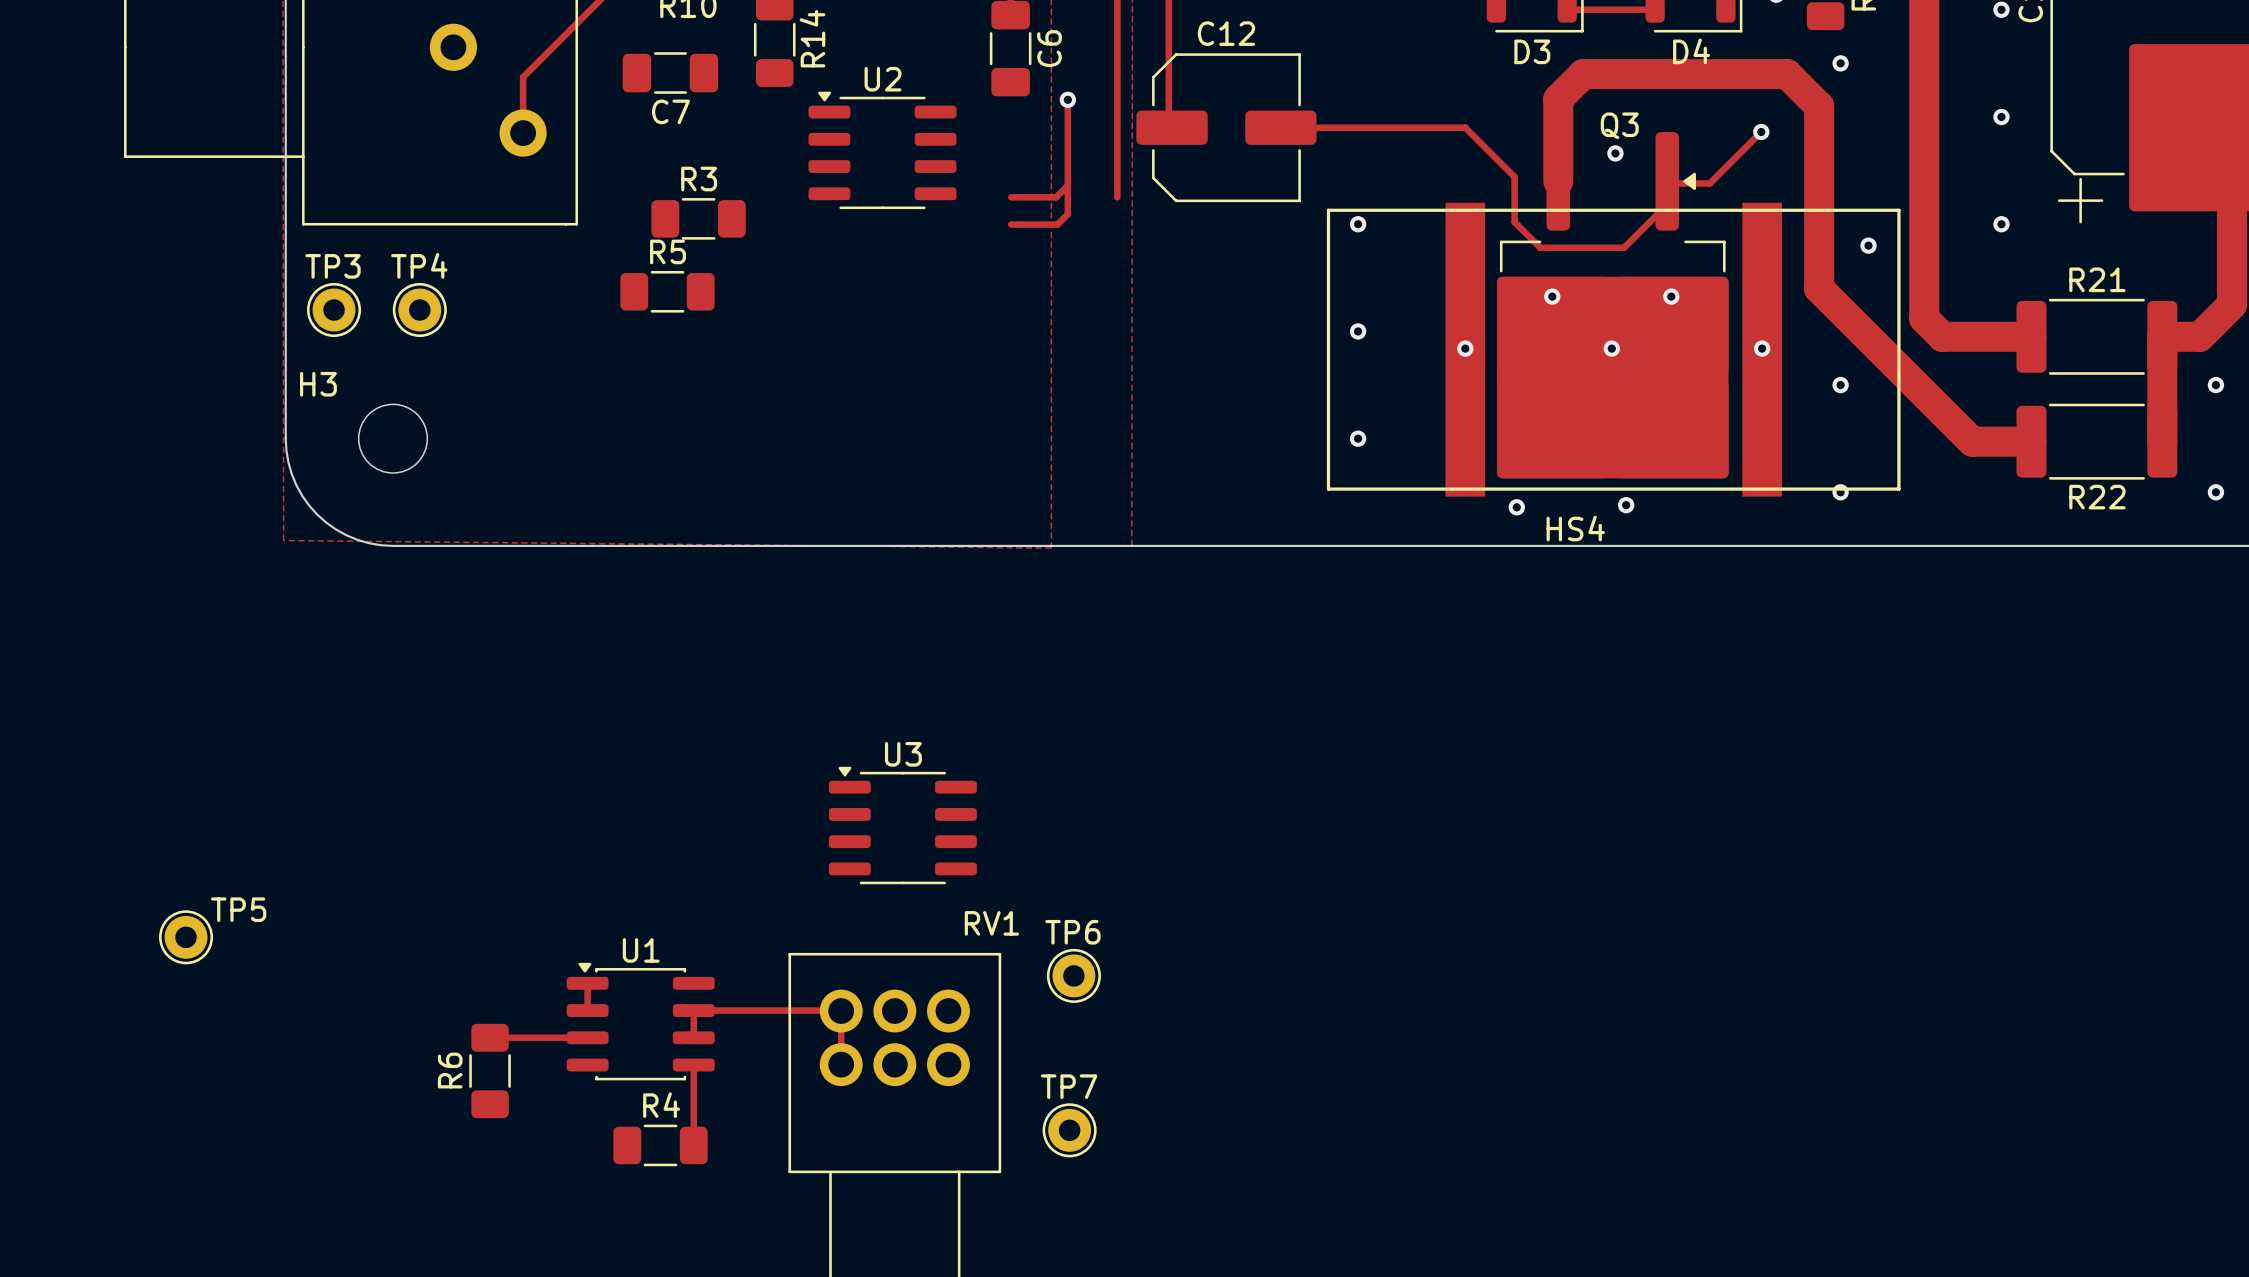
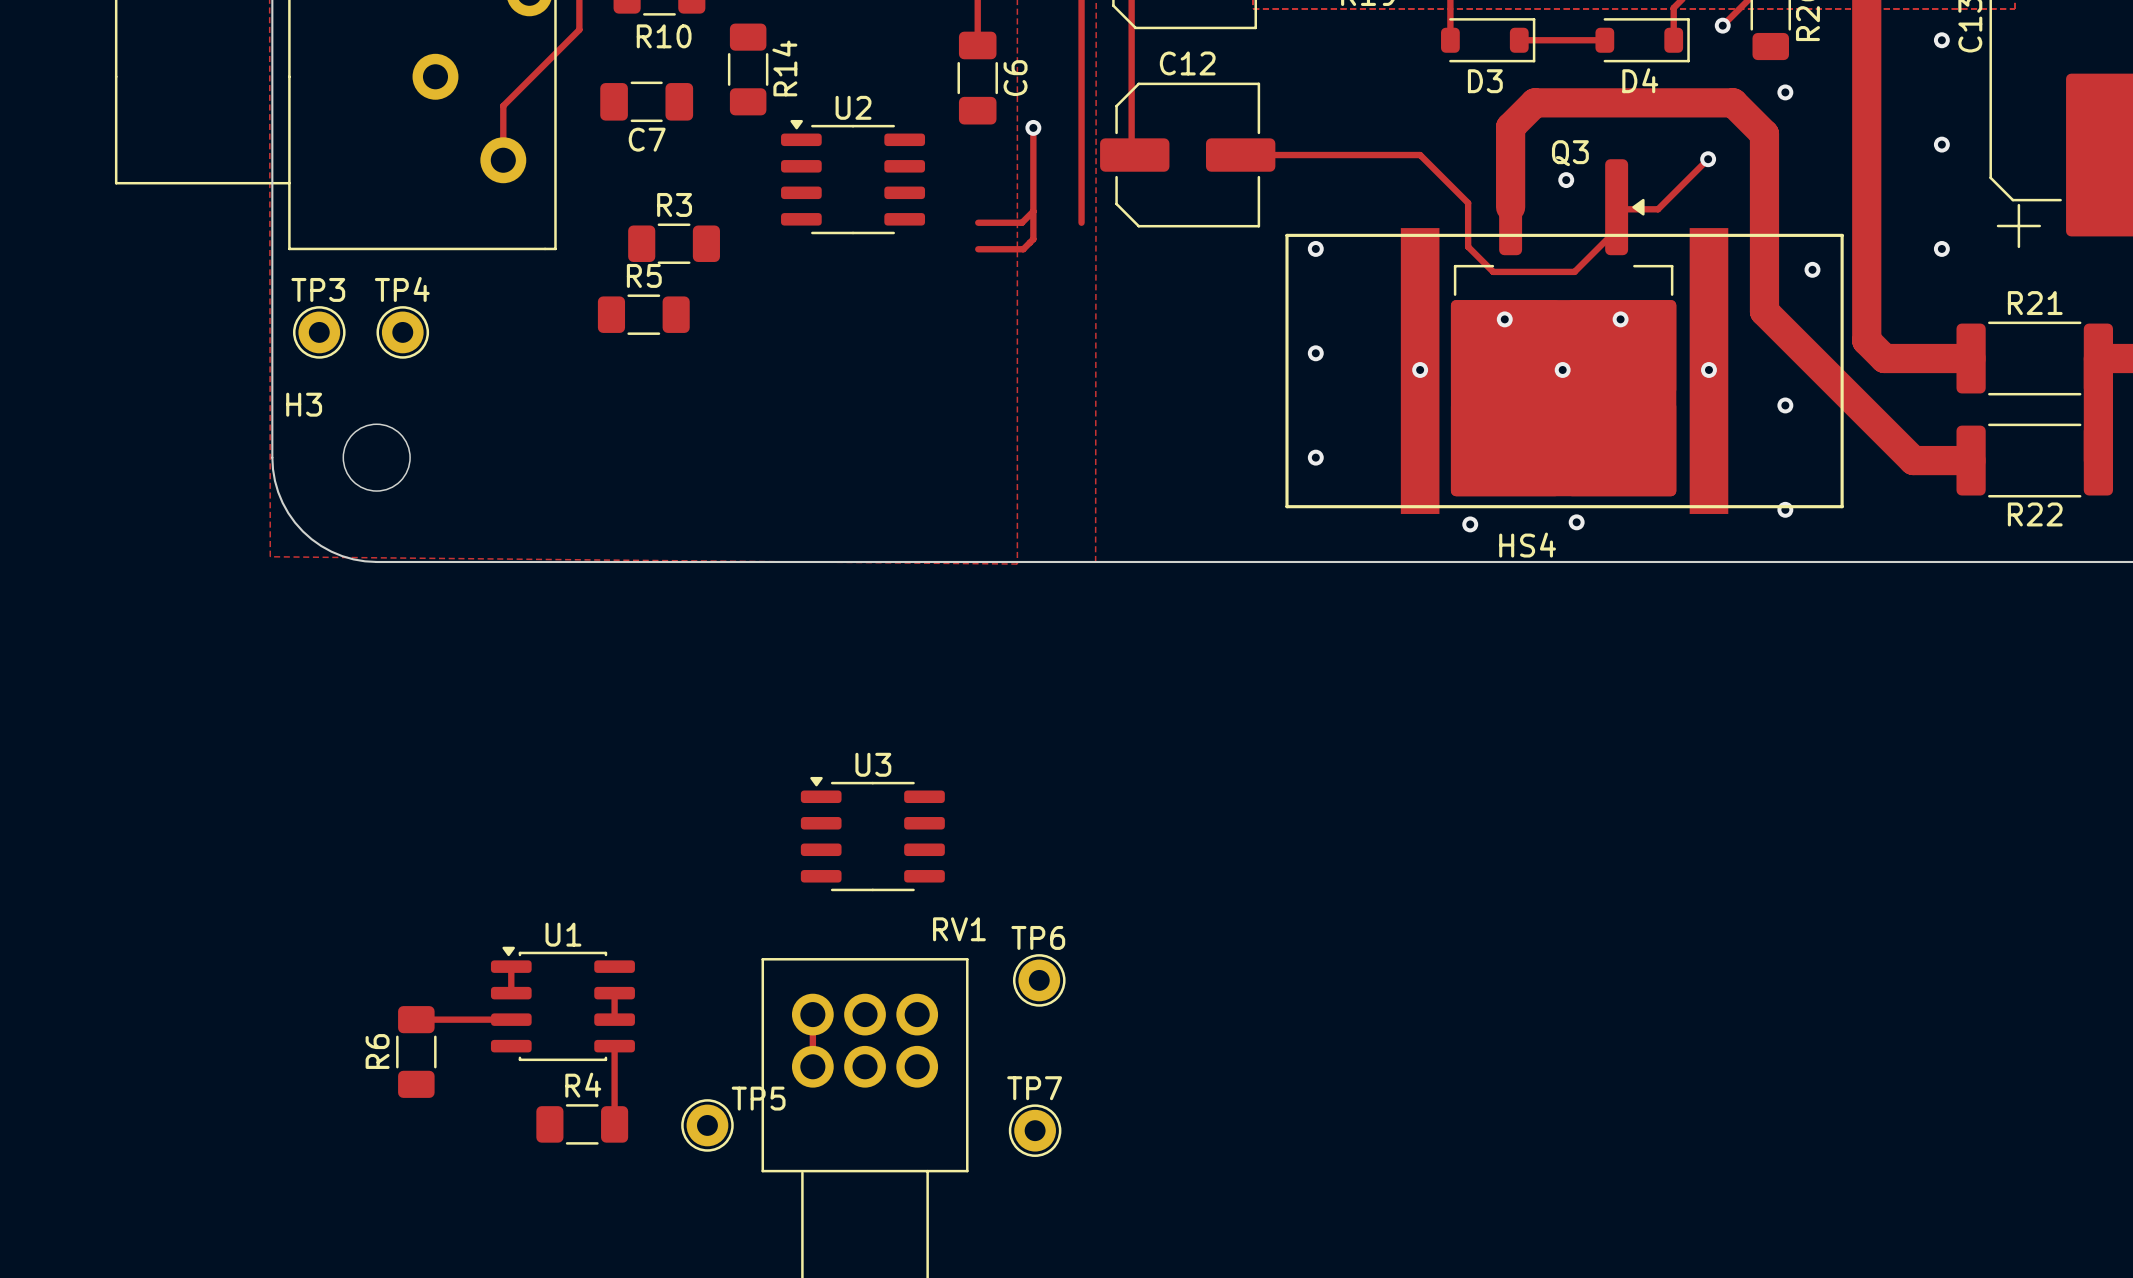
TP5 position: (186, 937) -> (707, 1125)
track: none -> (511, 966) (511, 993)
track: (587, 983) (587, 1010) -> (614, 993) (614, 1019)
track: (841, 1011) (693, 1010) (693, 1037) -> none
U1 position: (640, 1021) -> (562, 1003)
track: (490, 1037) (587, 1037) -> (416, 1019) (511, 1019)
track: (693, 1065) (693, 1145) -> (614, 1046) (614, 1124)
R6 position: (490, 1071) -> (416, 1051)
R4 position: (660, 1145) -> (582, 1124)

